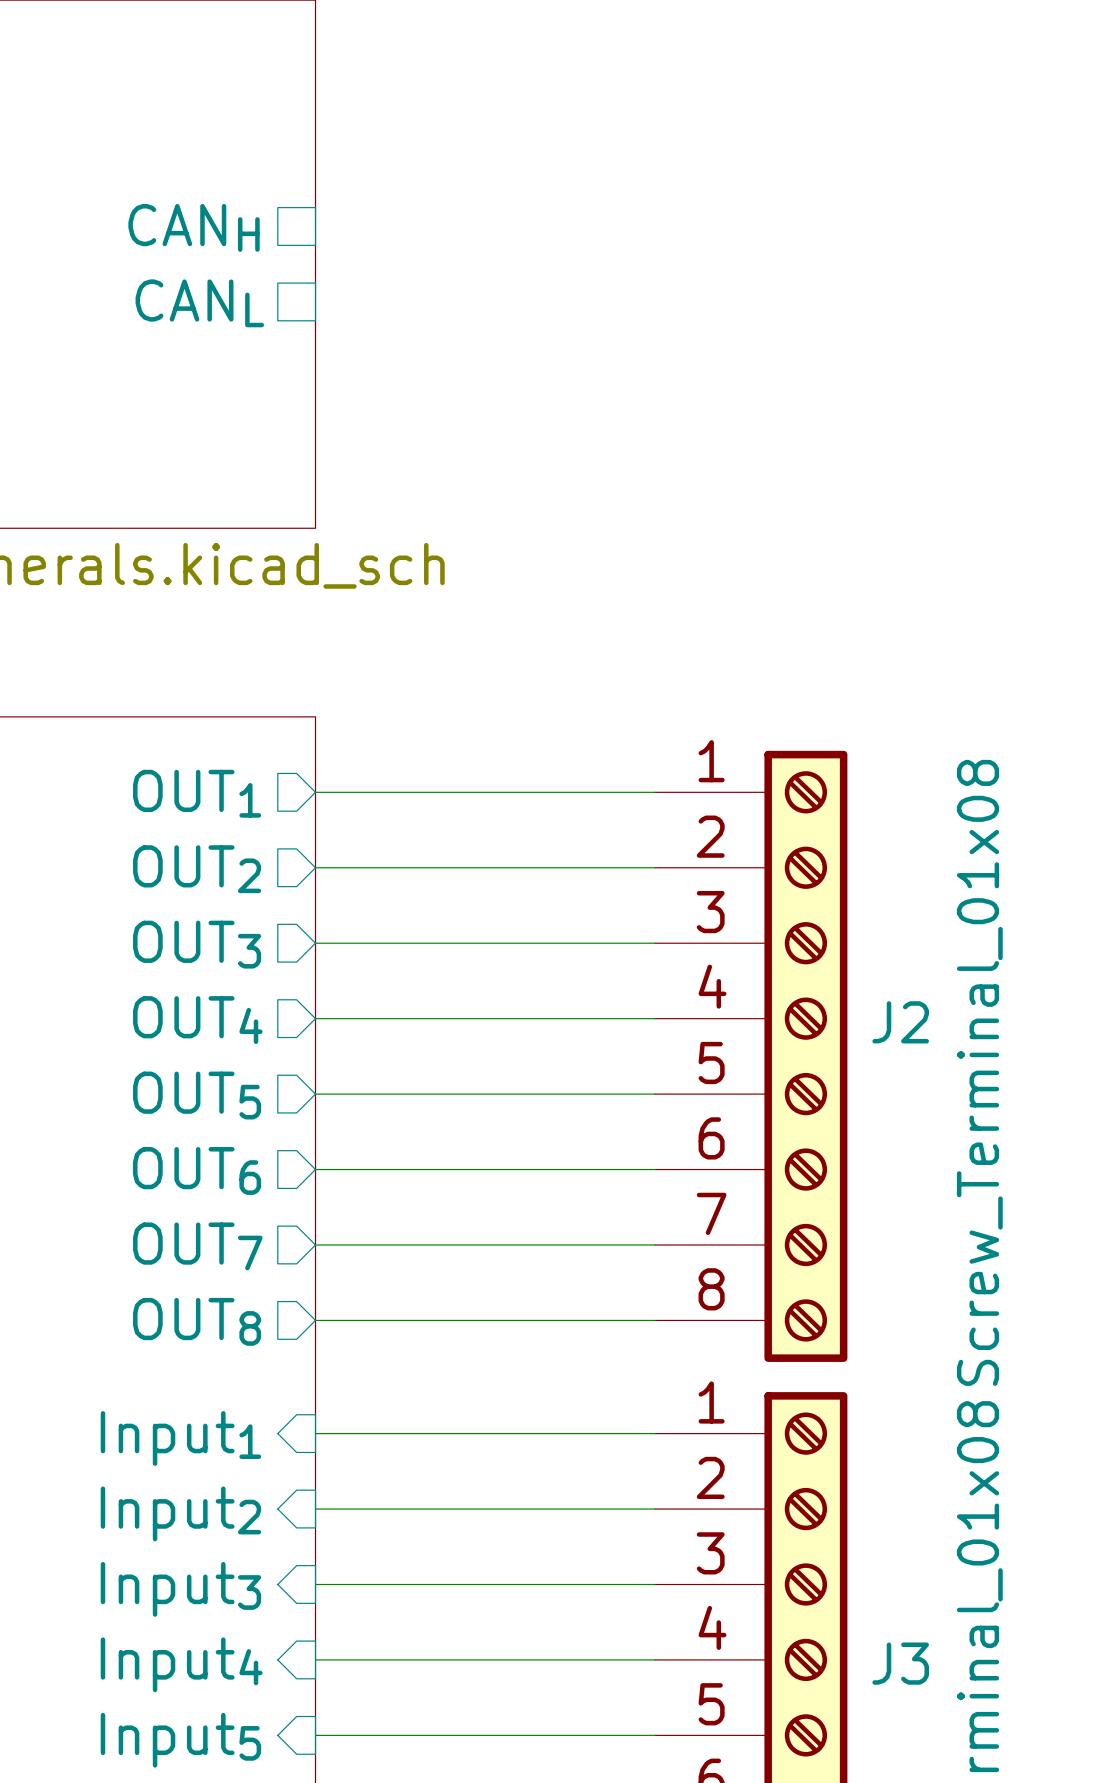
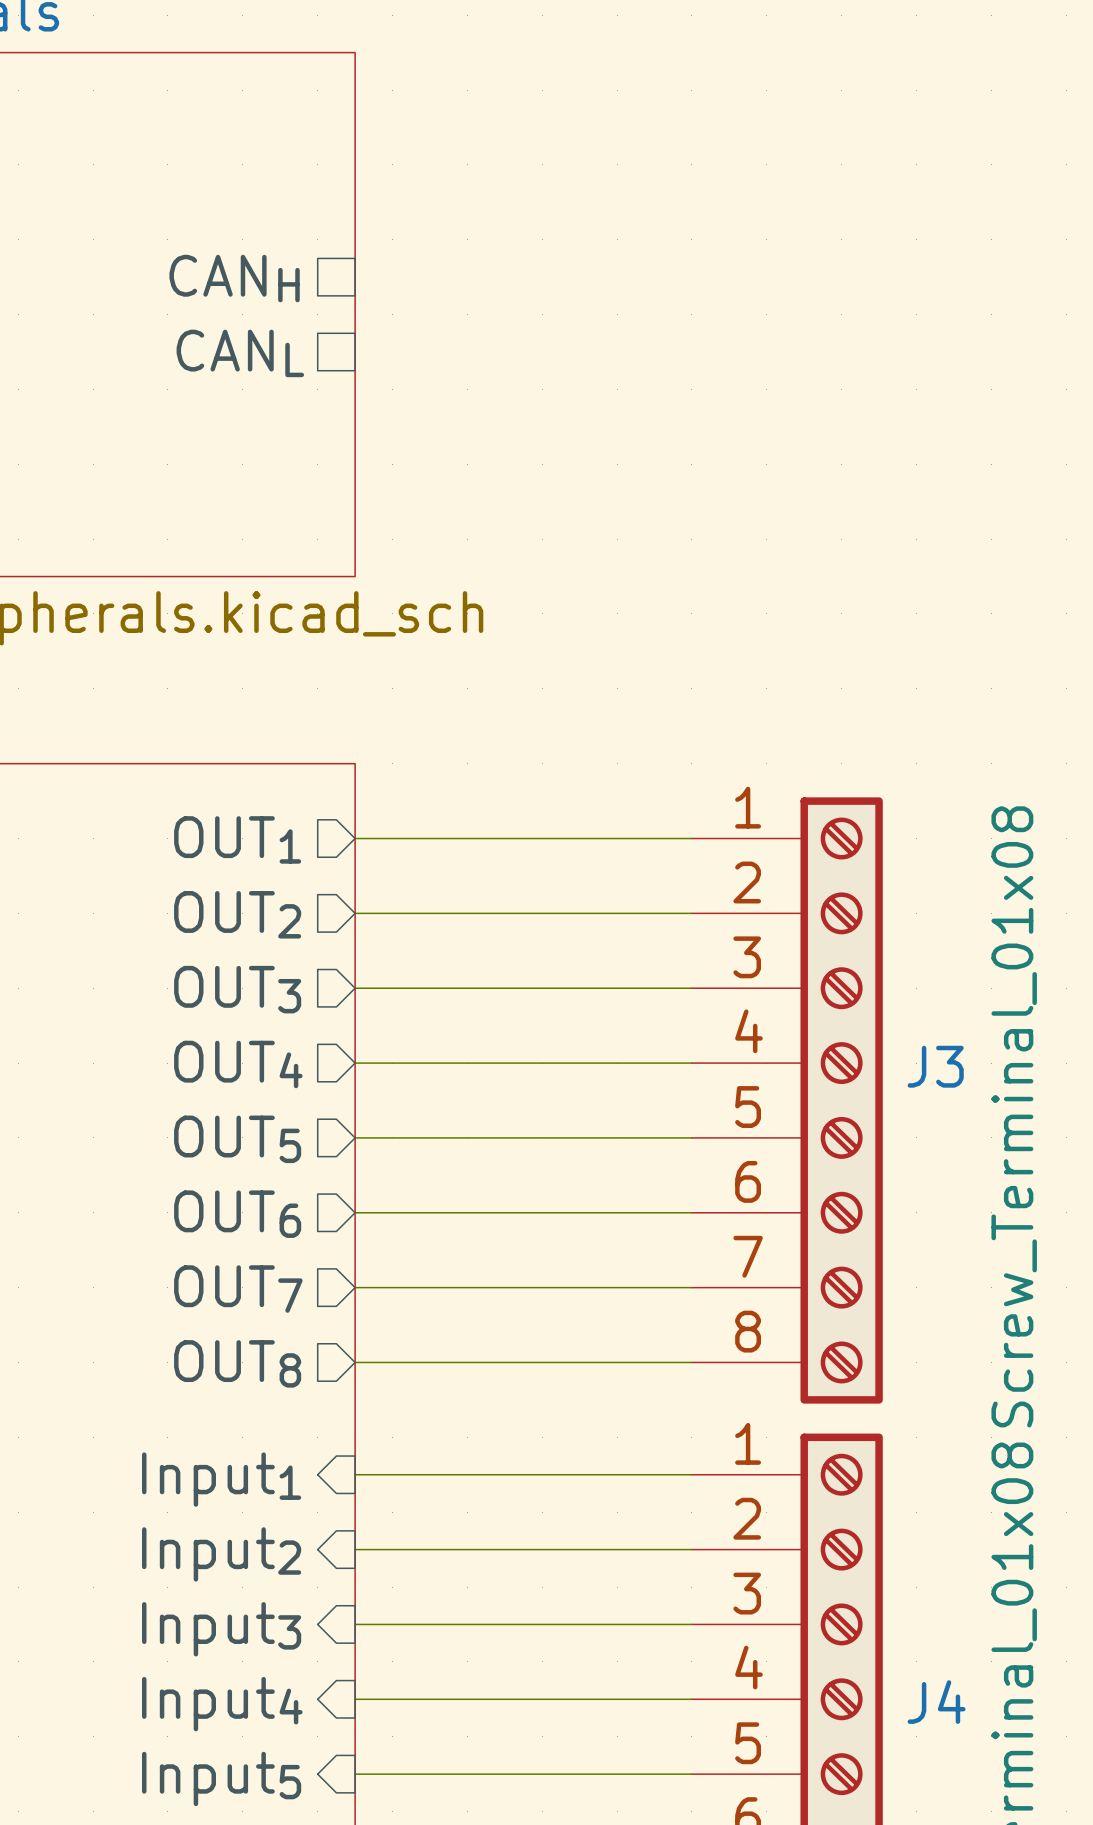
J2 name: J2 (900, 1022) -> J3 (935, 1066)
J3 name: J3 (900, 1663) -> J4 (936, 1702)

